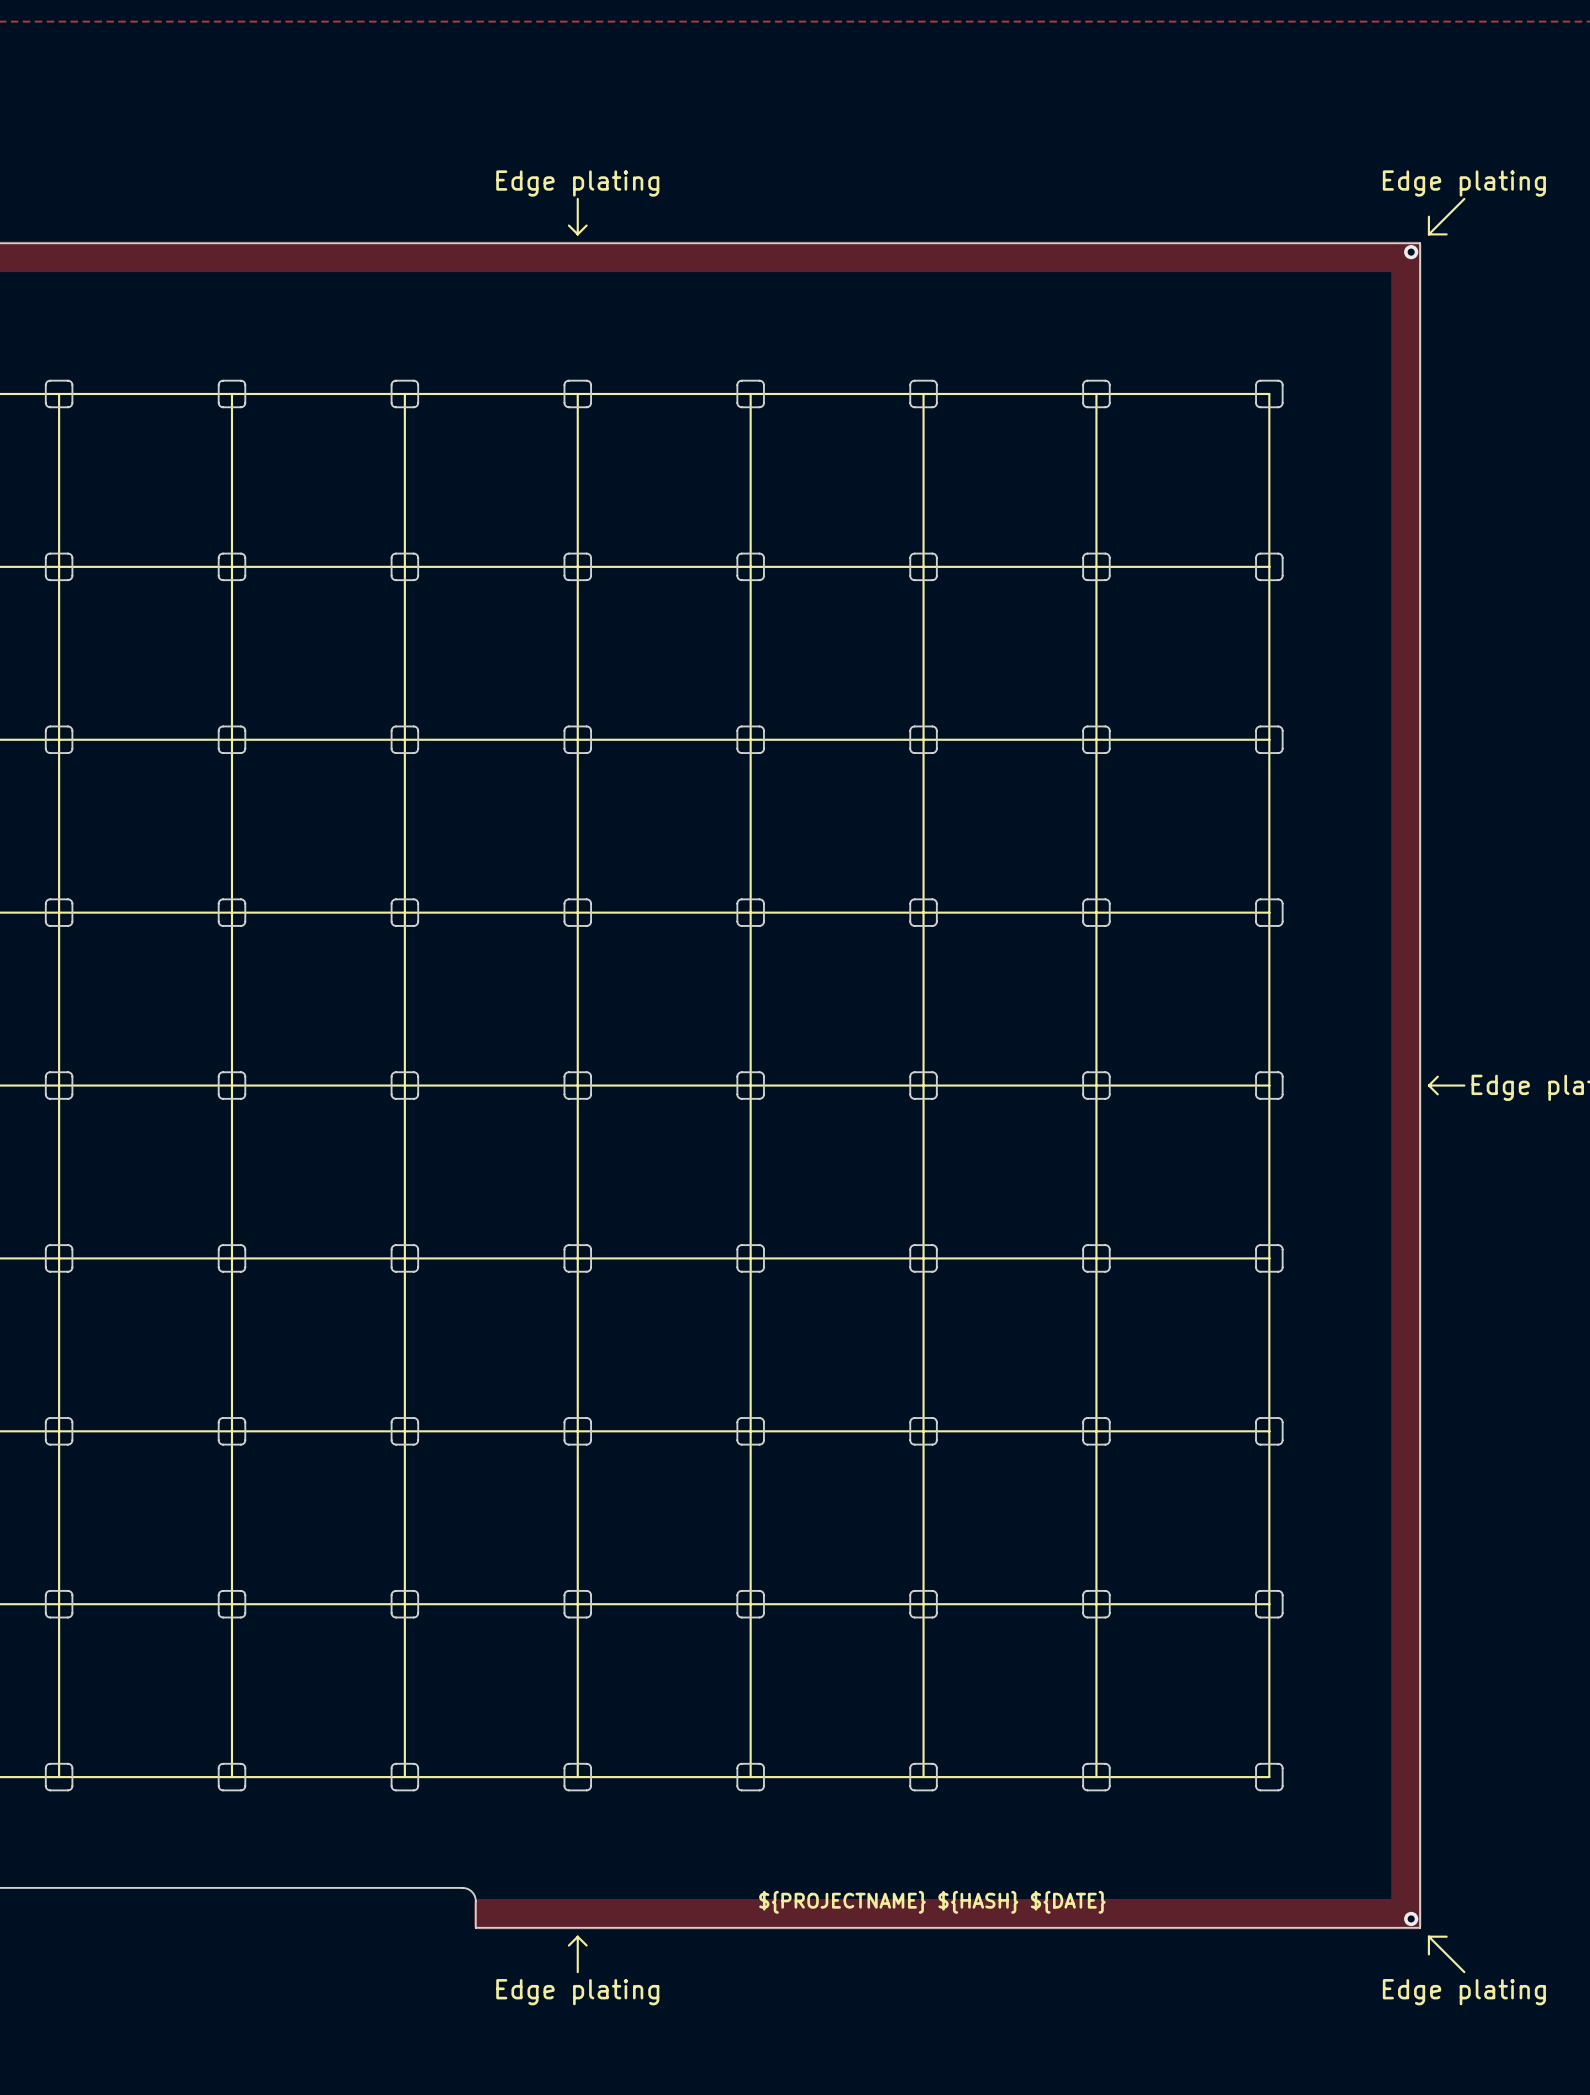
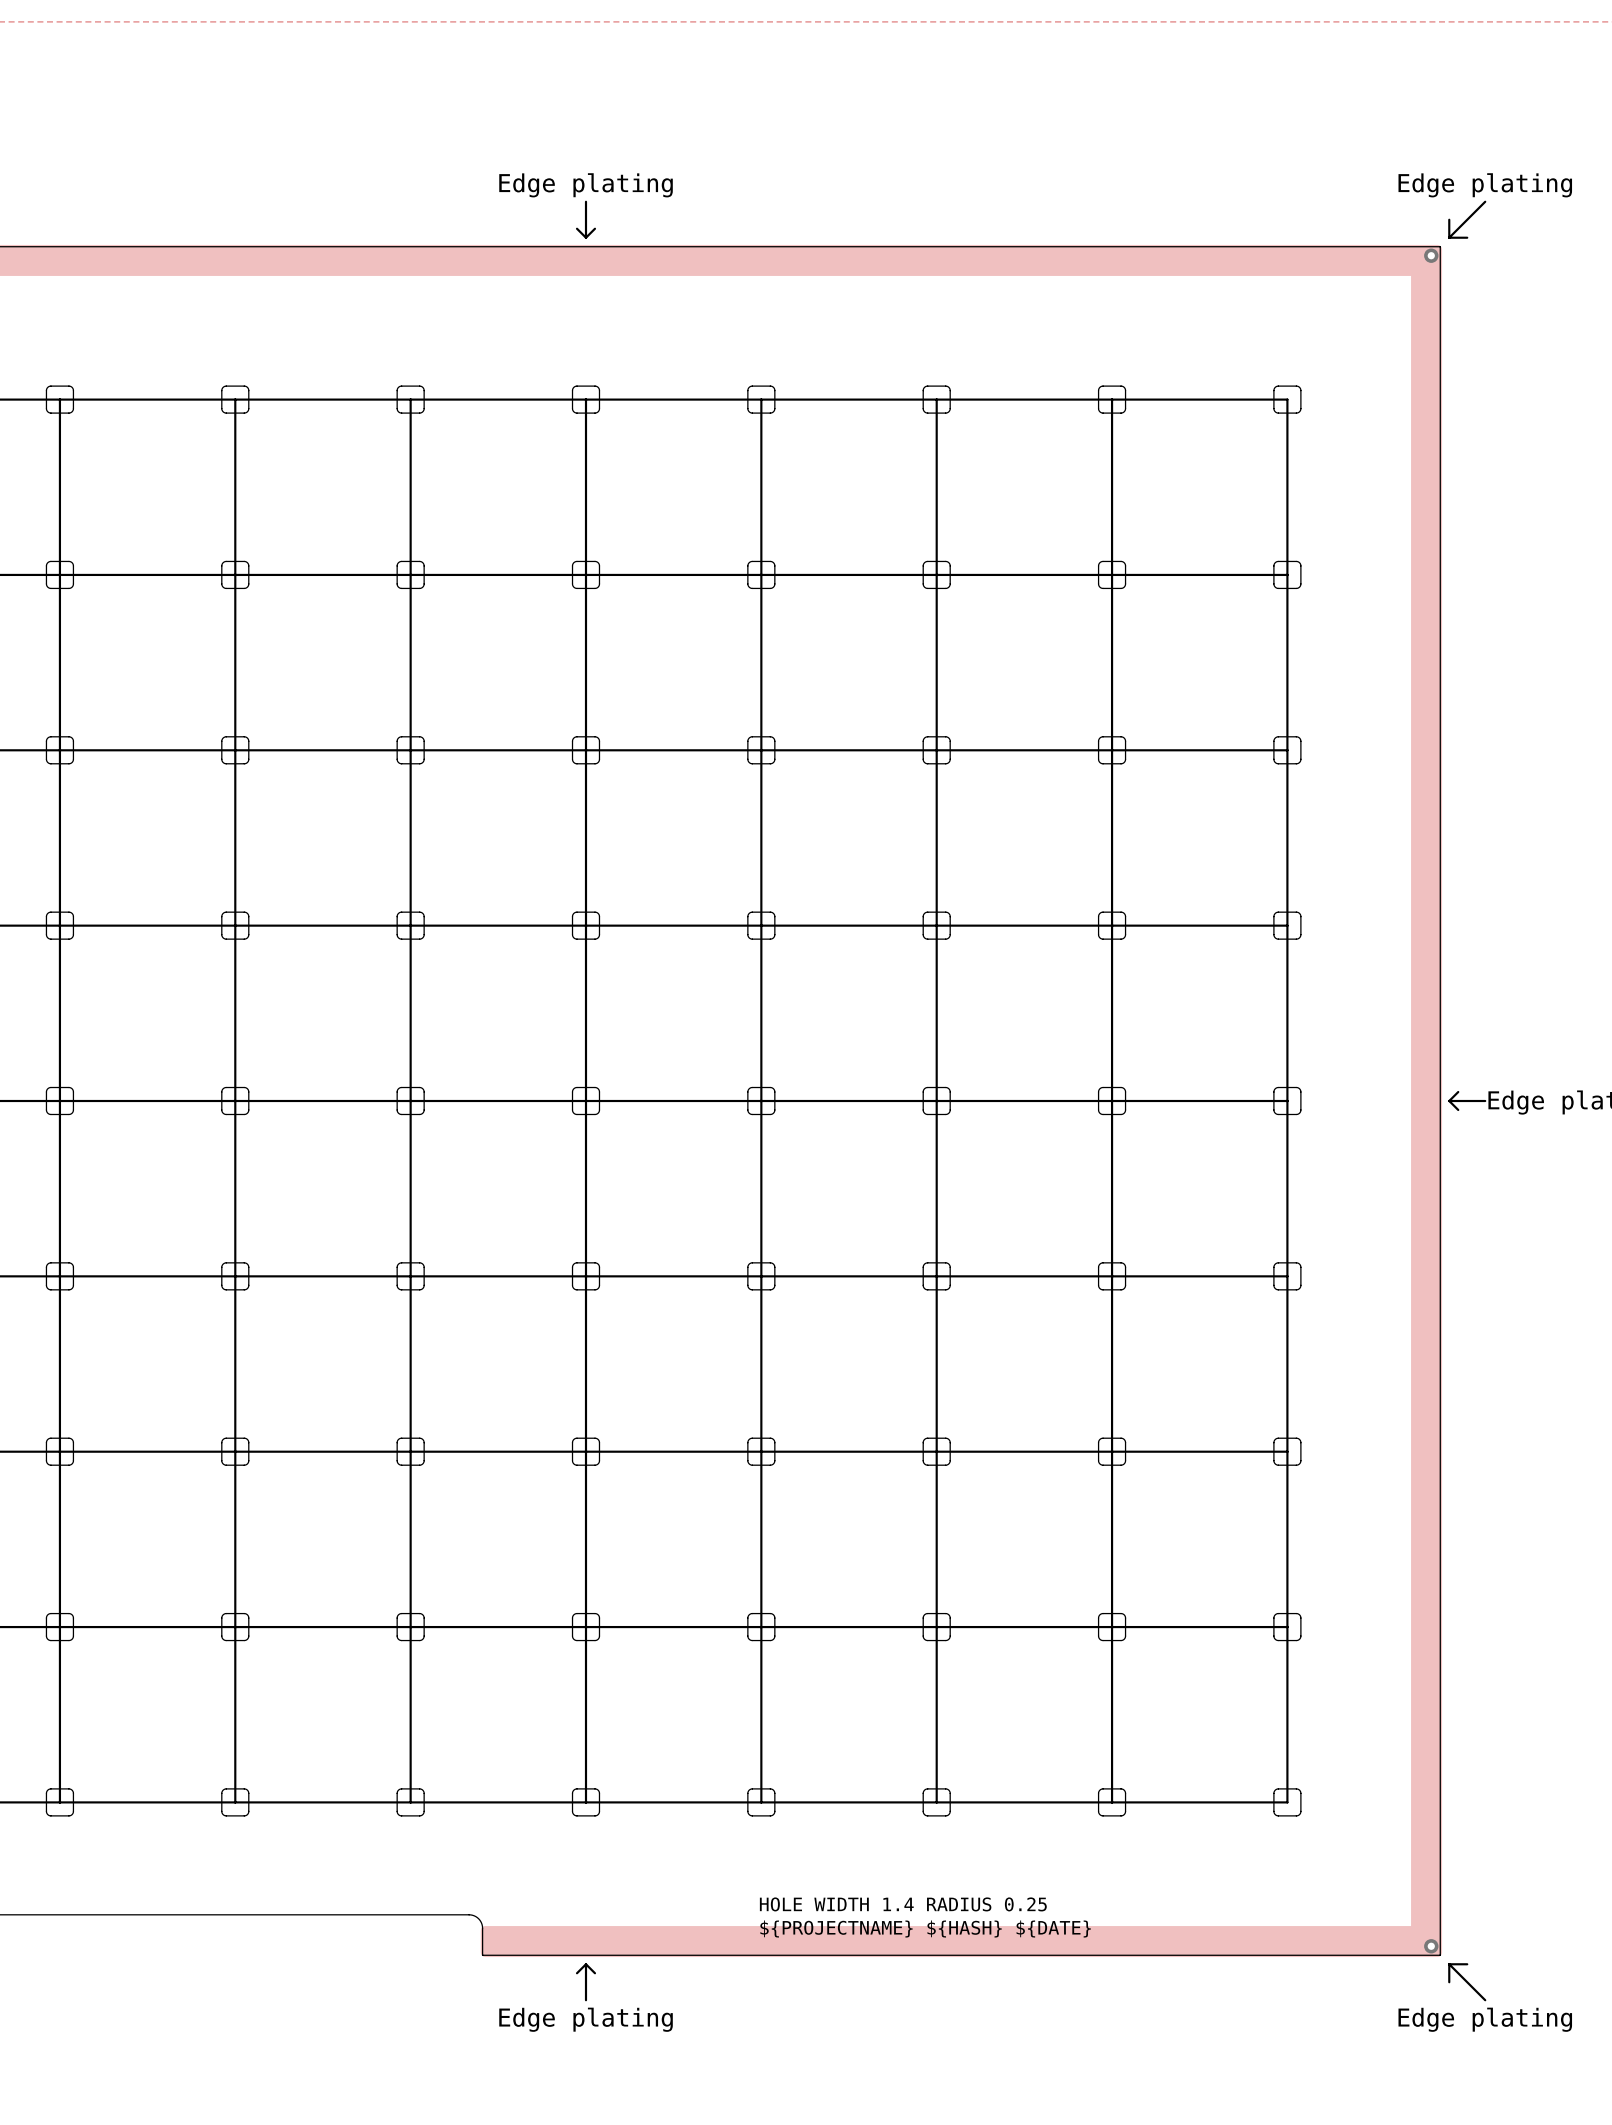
text: none -> HOLE WIDTH 1.4 RADIUS 0.25 (903, 1904)
text position: ${PROJECTNAME} ${HASH} ${DATE} (932, 1902) -> ${PROJECTNAME} ${HASH} ${DATE} (925, 1929)

